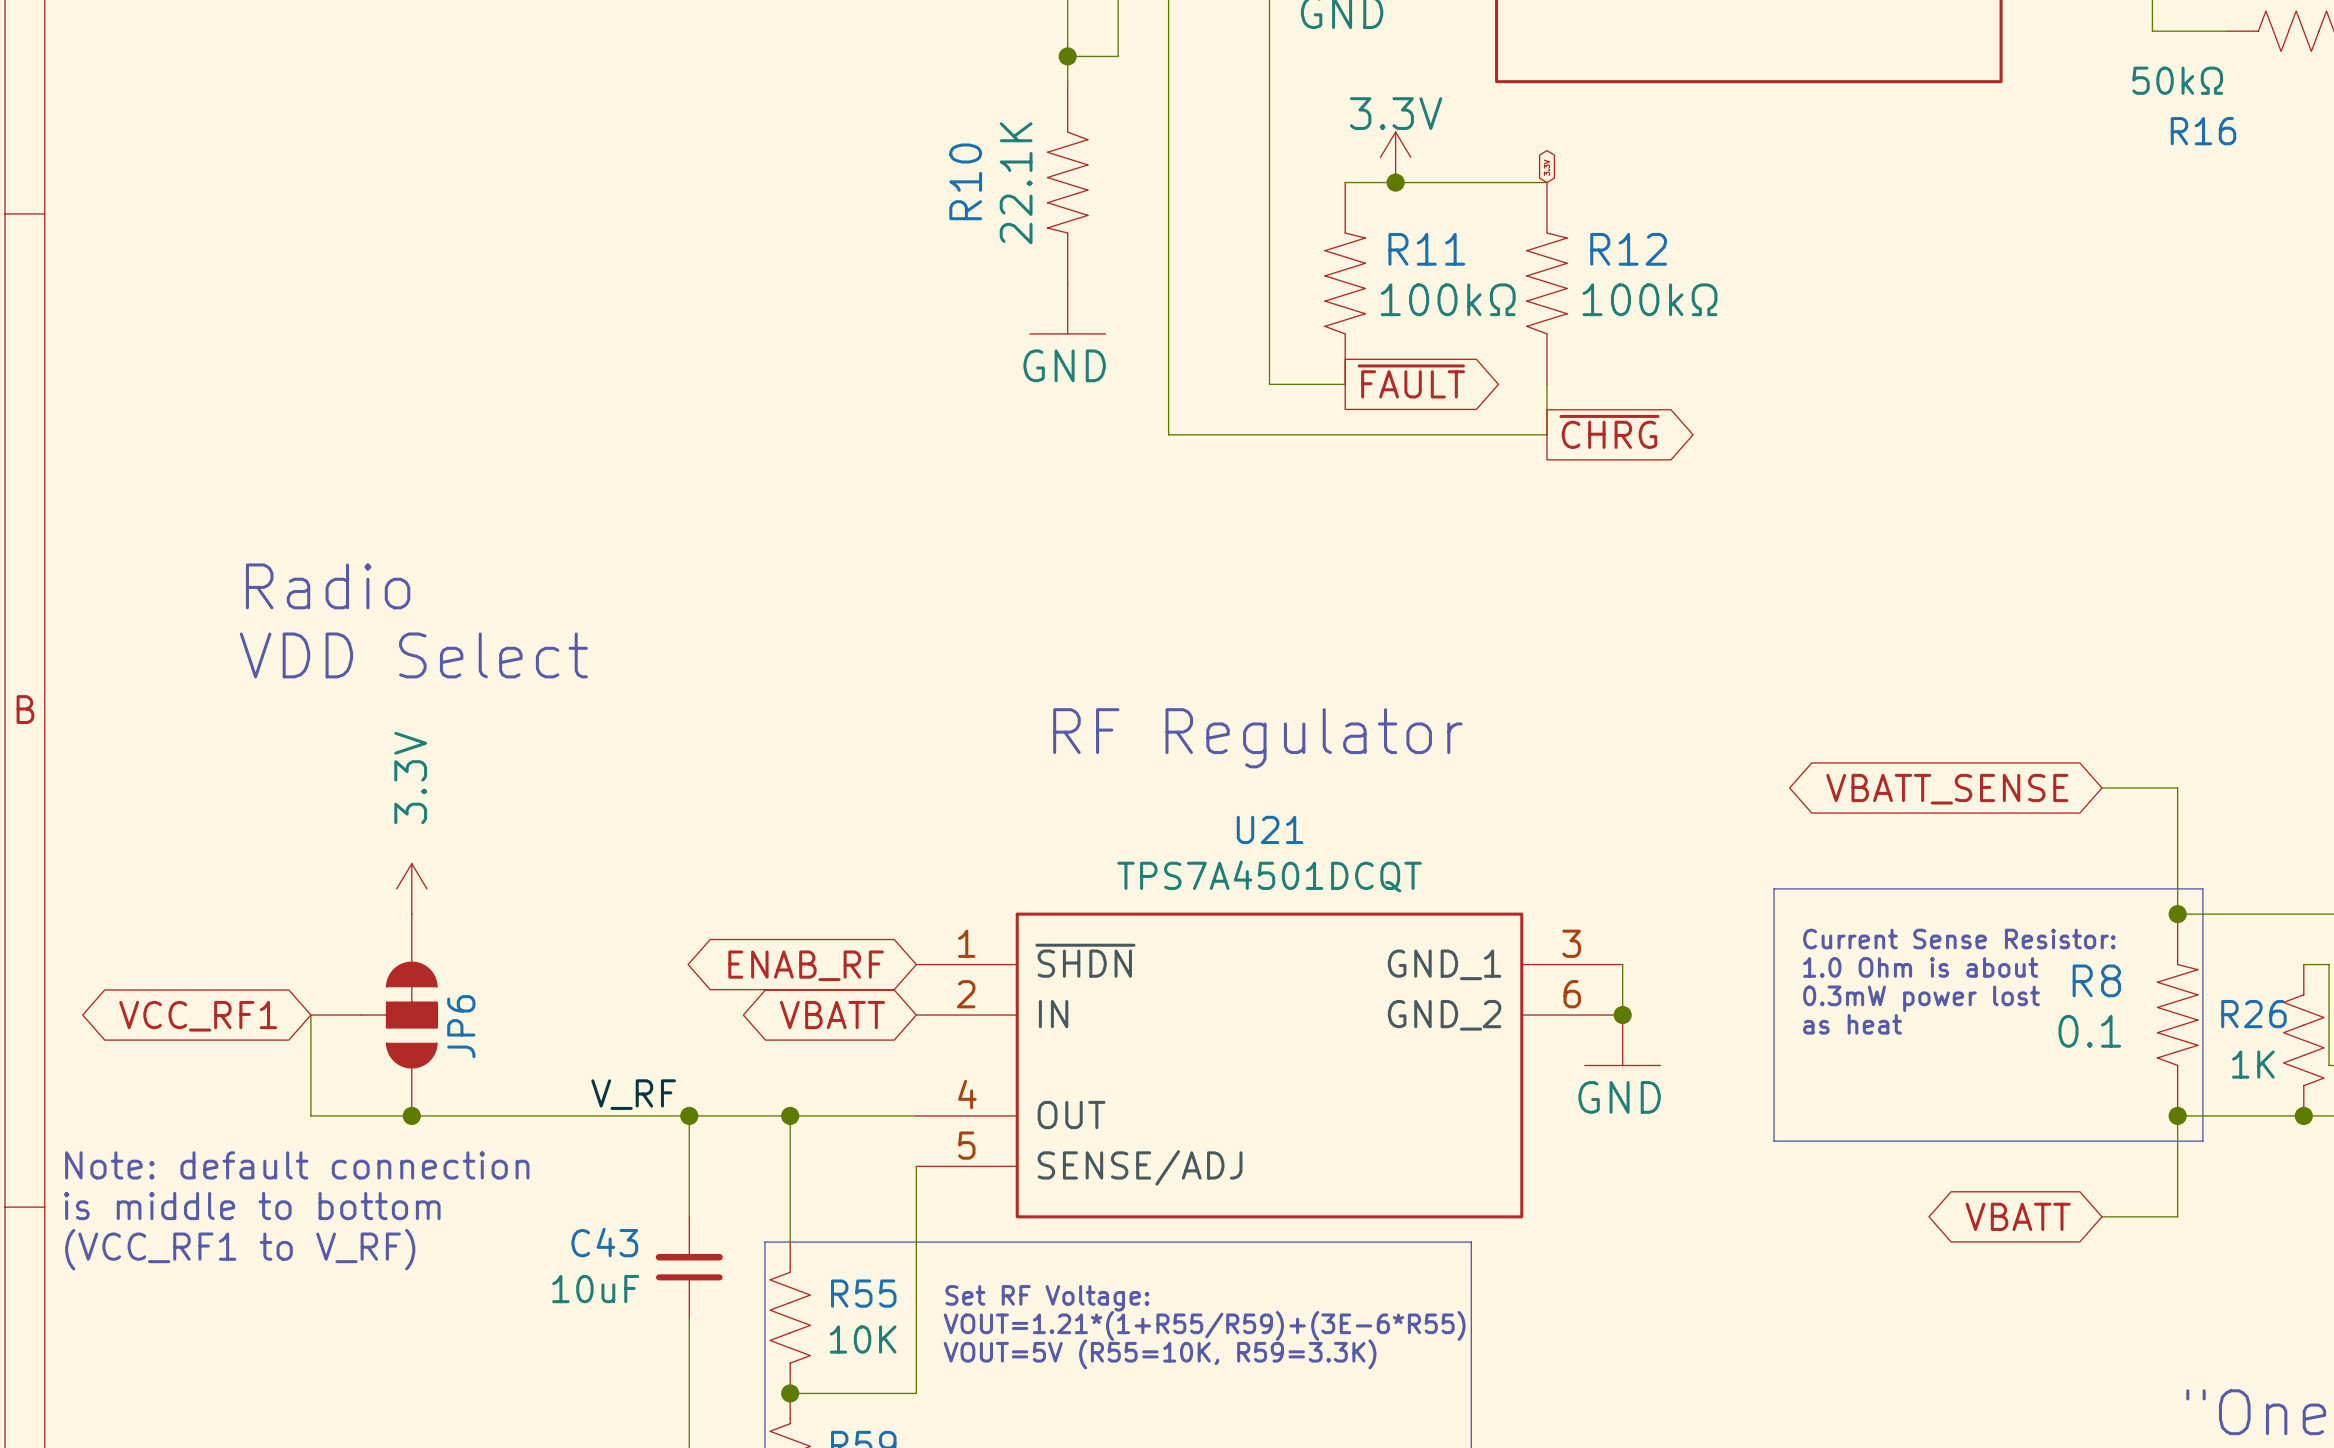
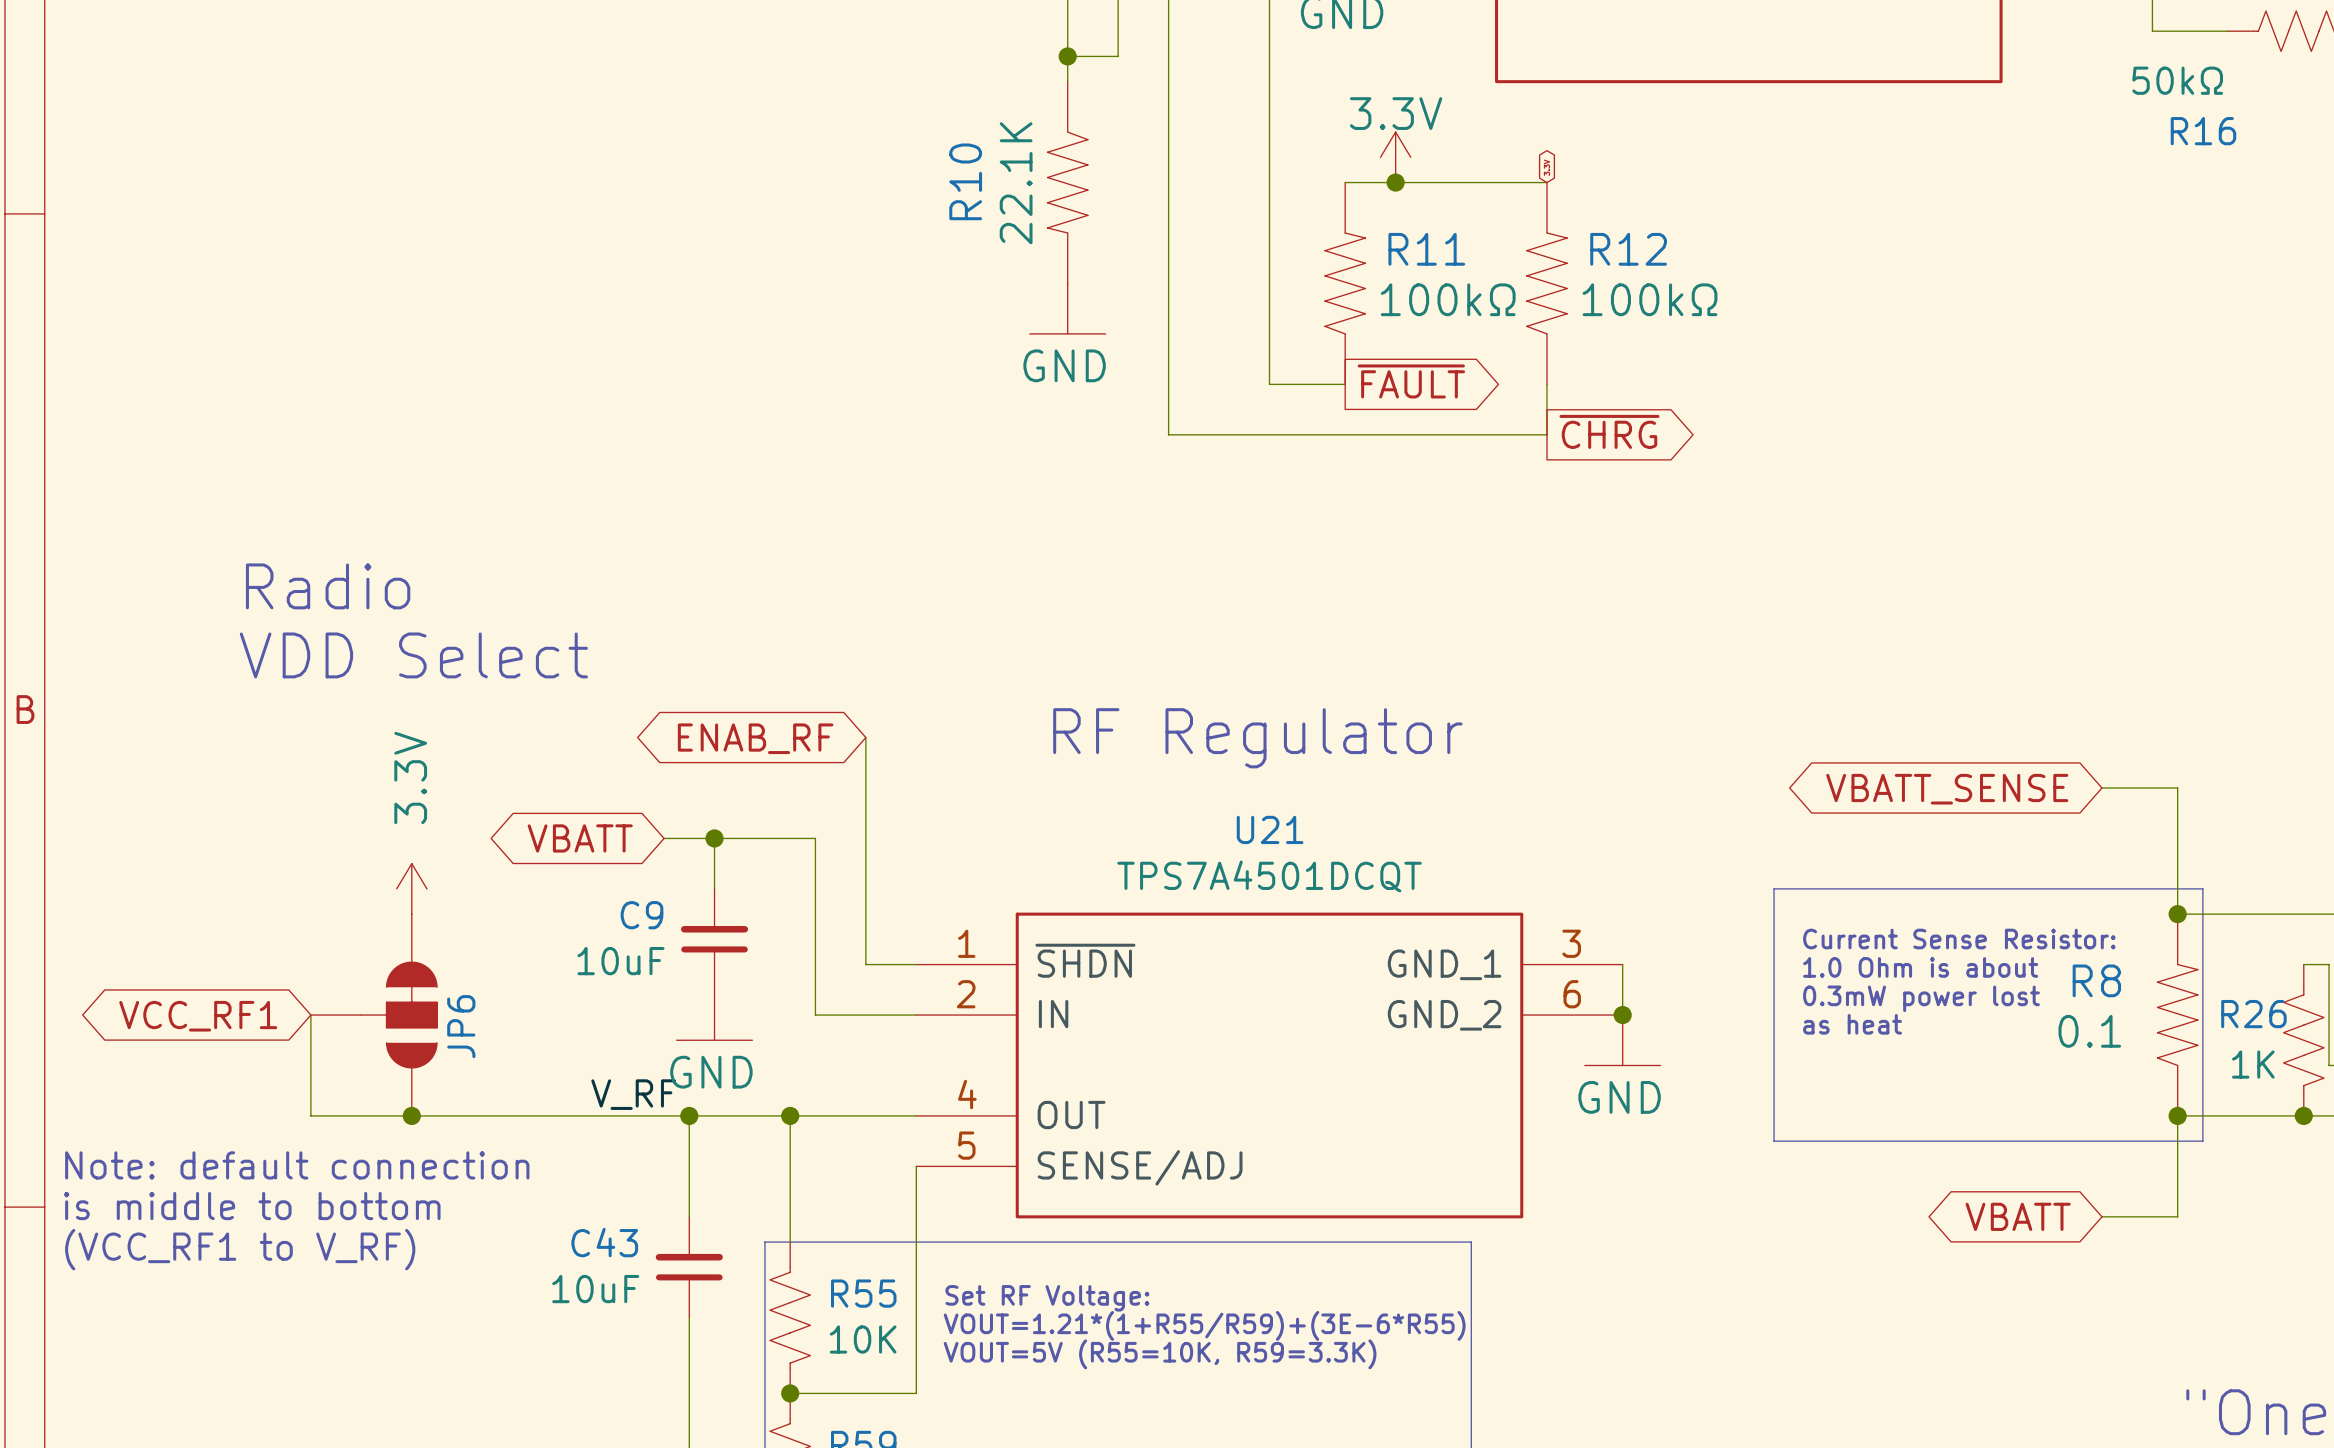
wire: none -> (865, 737) (865, 964) (916, 964)
wire: none -> (664, 838) (815, 838) (815, 1015) (916, 1015)
wire: none -> (714, 838) (714, 888)
junction: none -> (714, 838)
C9: none -> 10uF (714, 939)
global label position: ENAB_RF (806, 965) -> ENAB_RF (755, 738)
power symbol: none -> GND (714, 1015)
global label position: VBATT (832, 1015) -> VBATT (580, 838)

